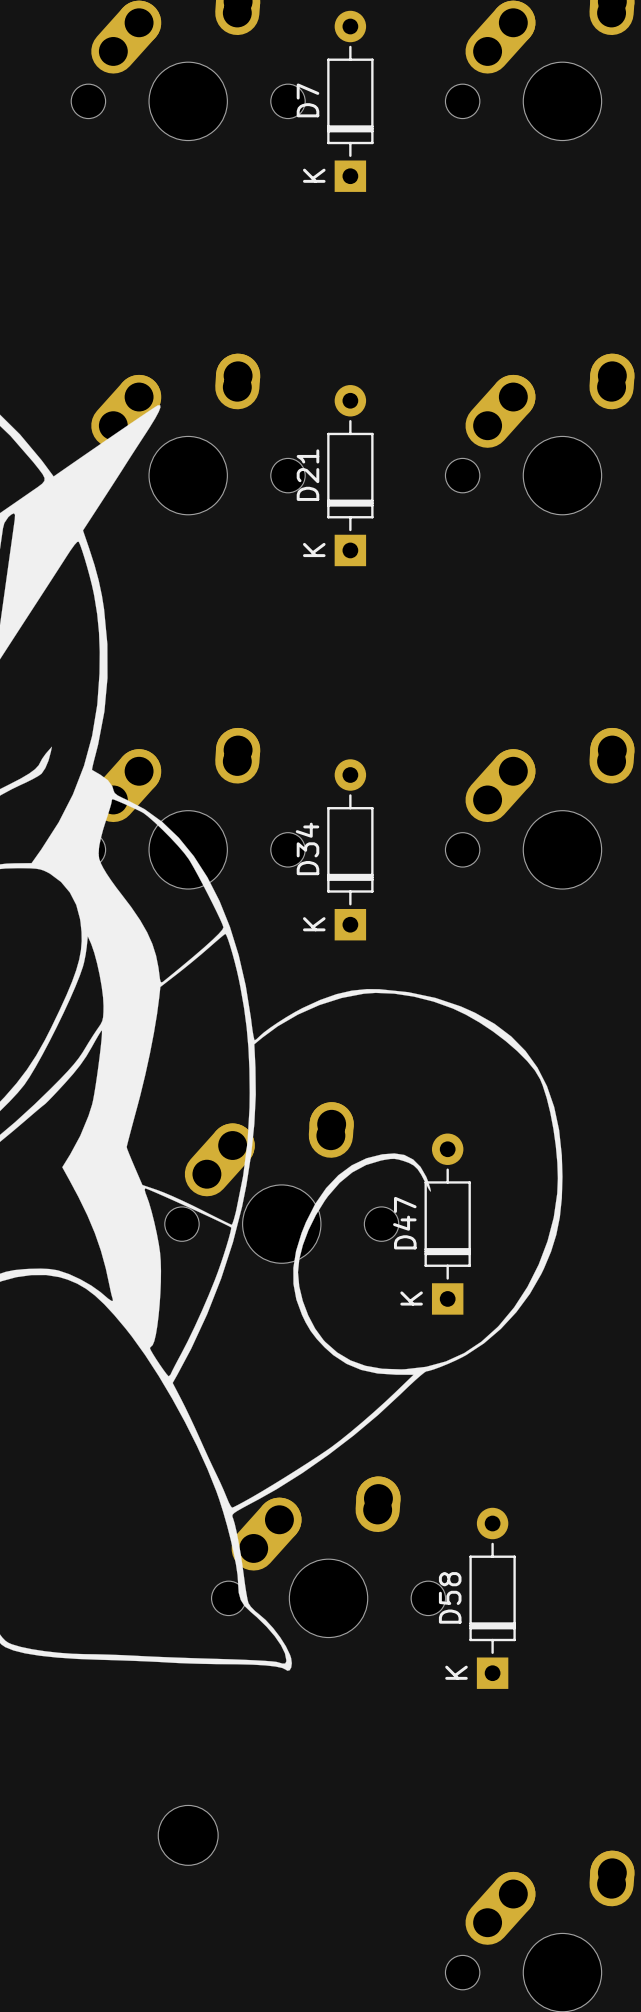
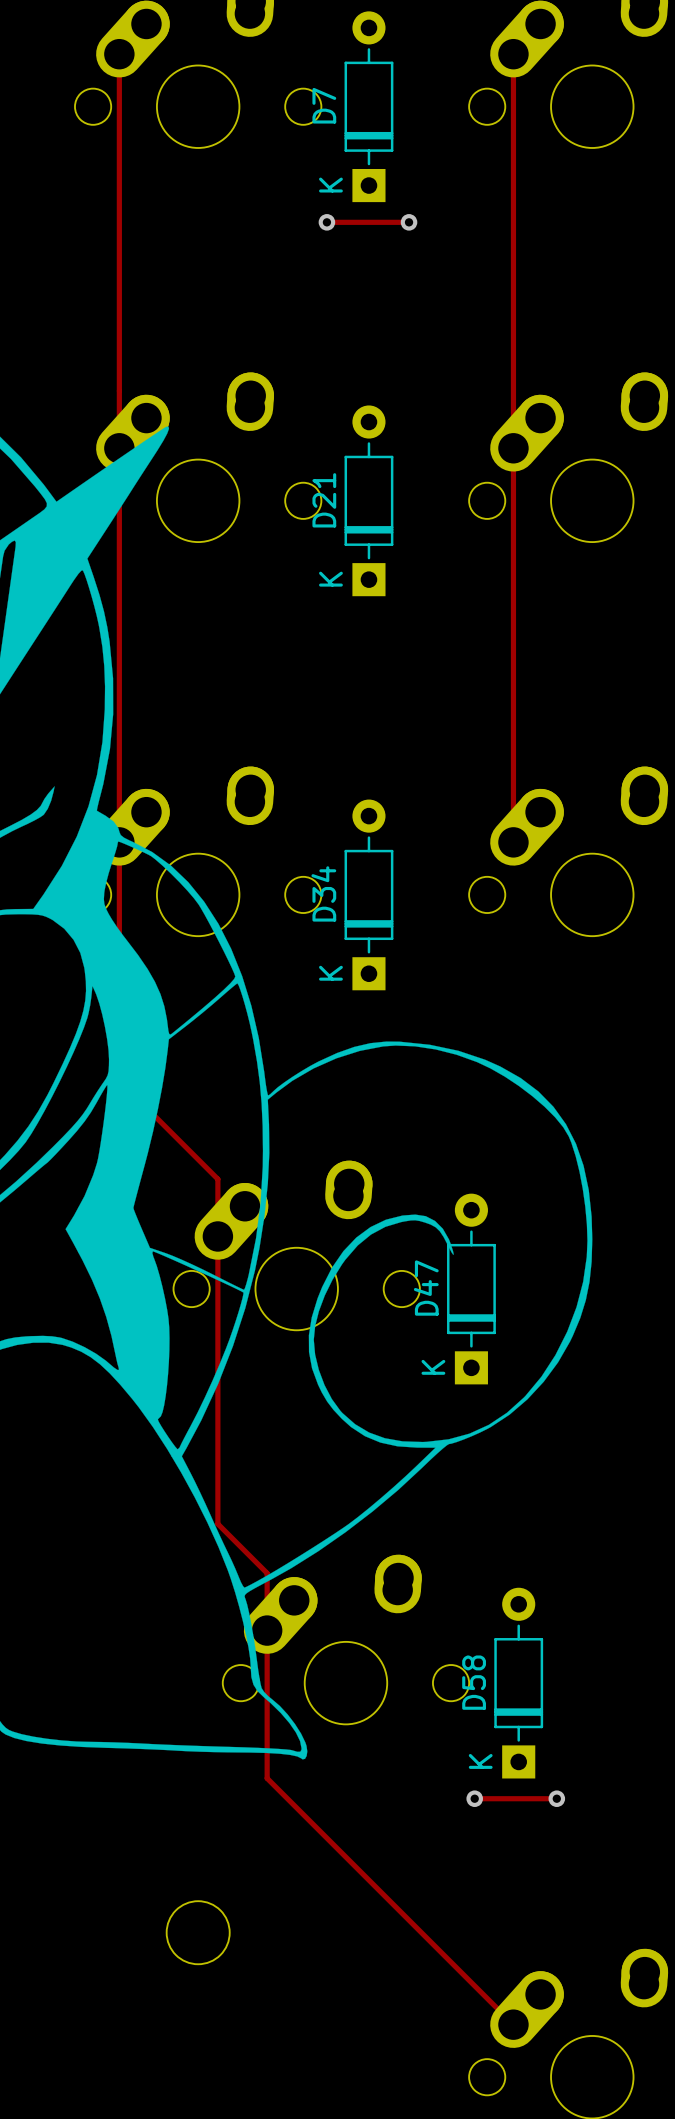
track: none -> (119, 54) (119, 1080) (217, 1179) (217, 1524) (267, 1573) (267, 1778) (513, 2024)
track: none -> (513, 54) (513, 842)
track: none -> (326, 222) (409, 222)
via: none -> (326, 222)
via: none -> (409, 222)
track: none -> (474, 1798) (556, 1798)
via: none -> (474, 1798)
via: none -> (556, 1798)

